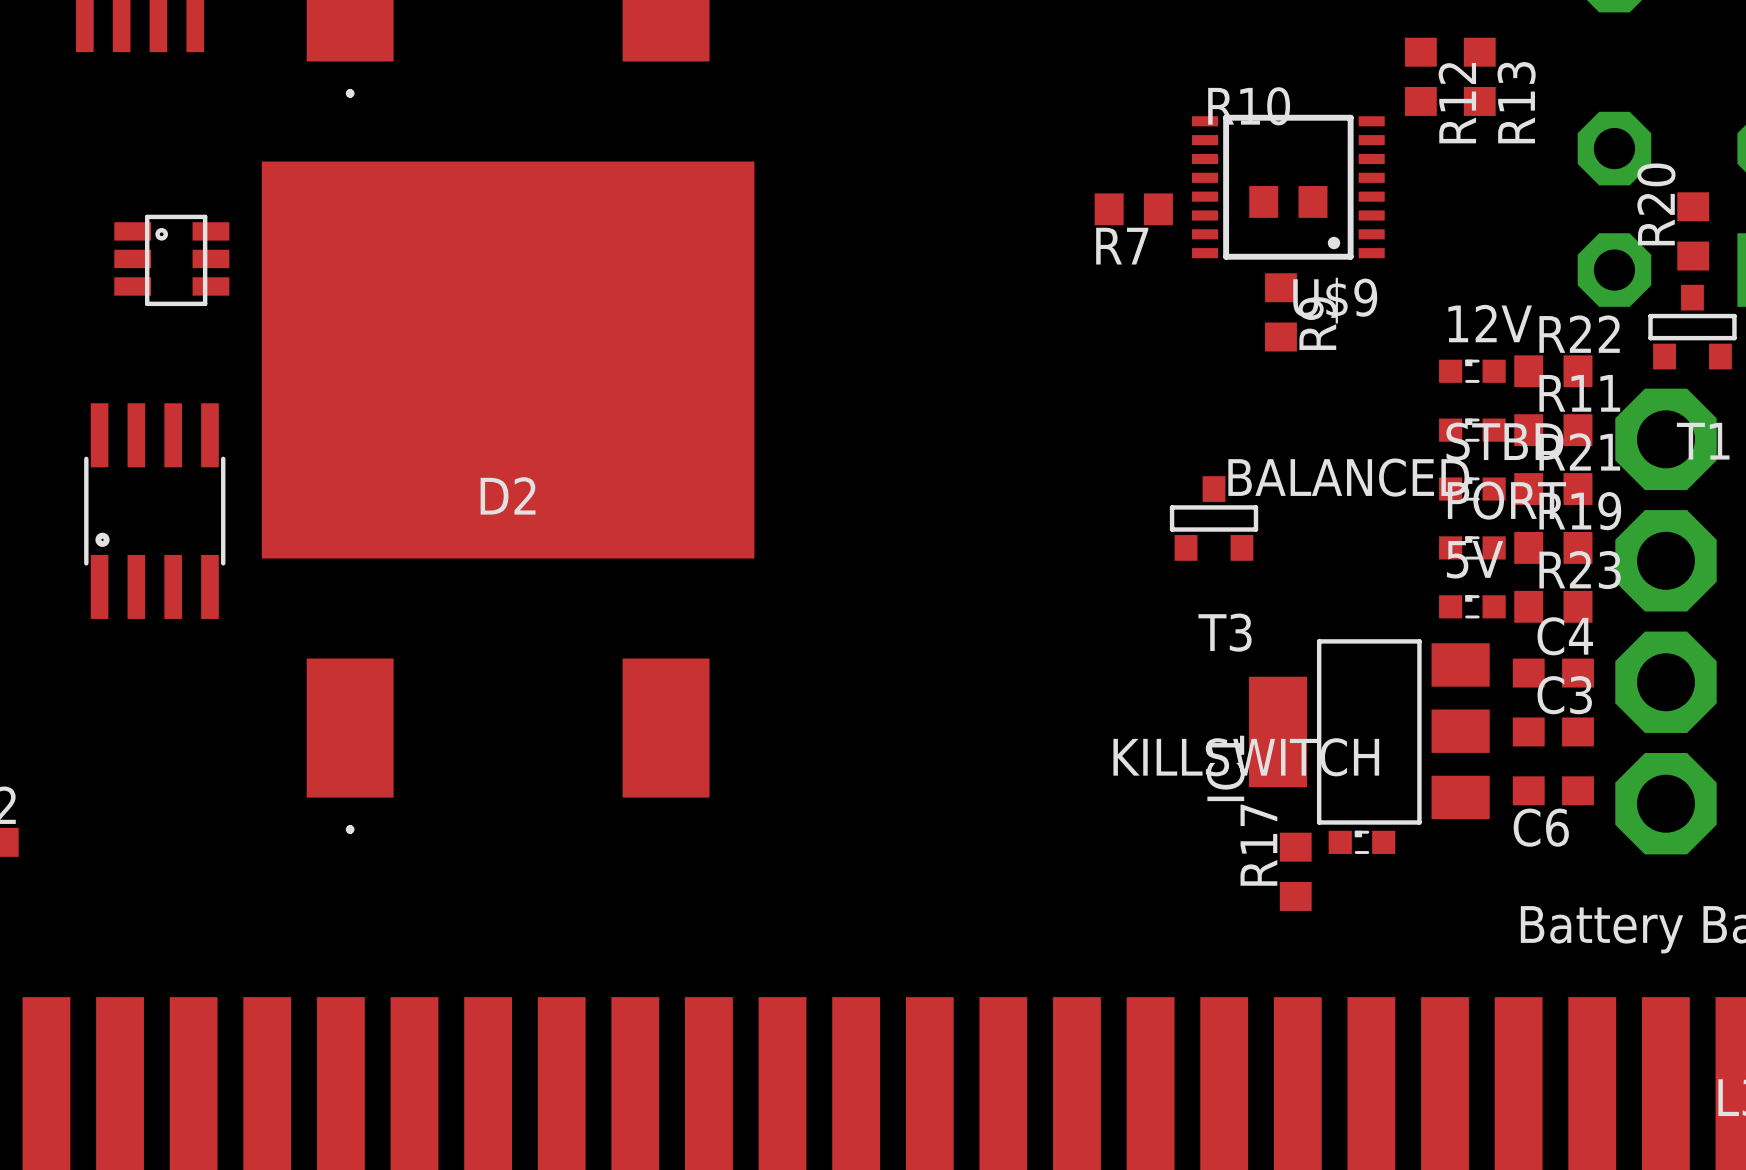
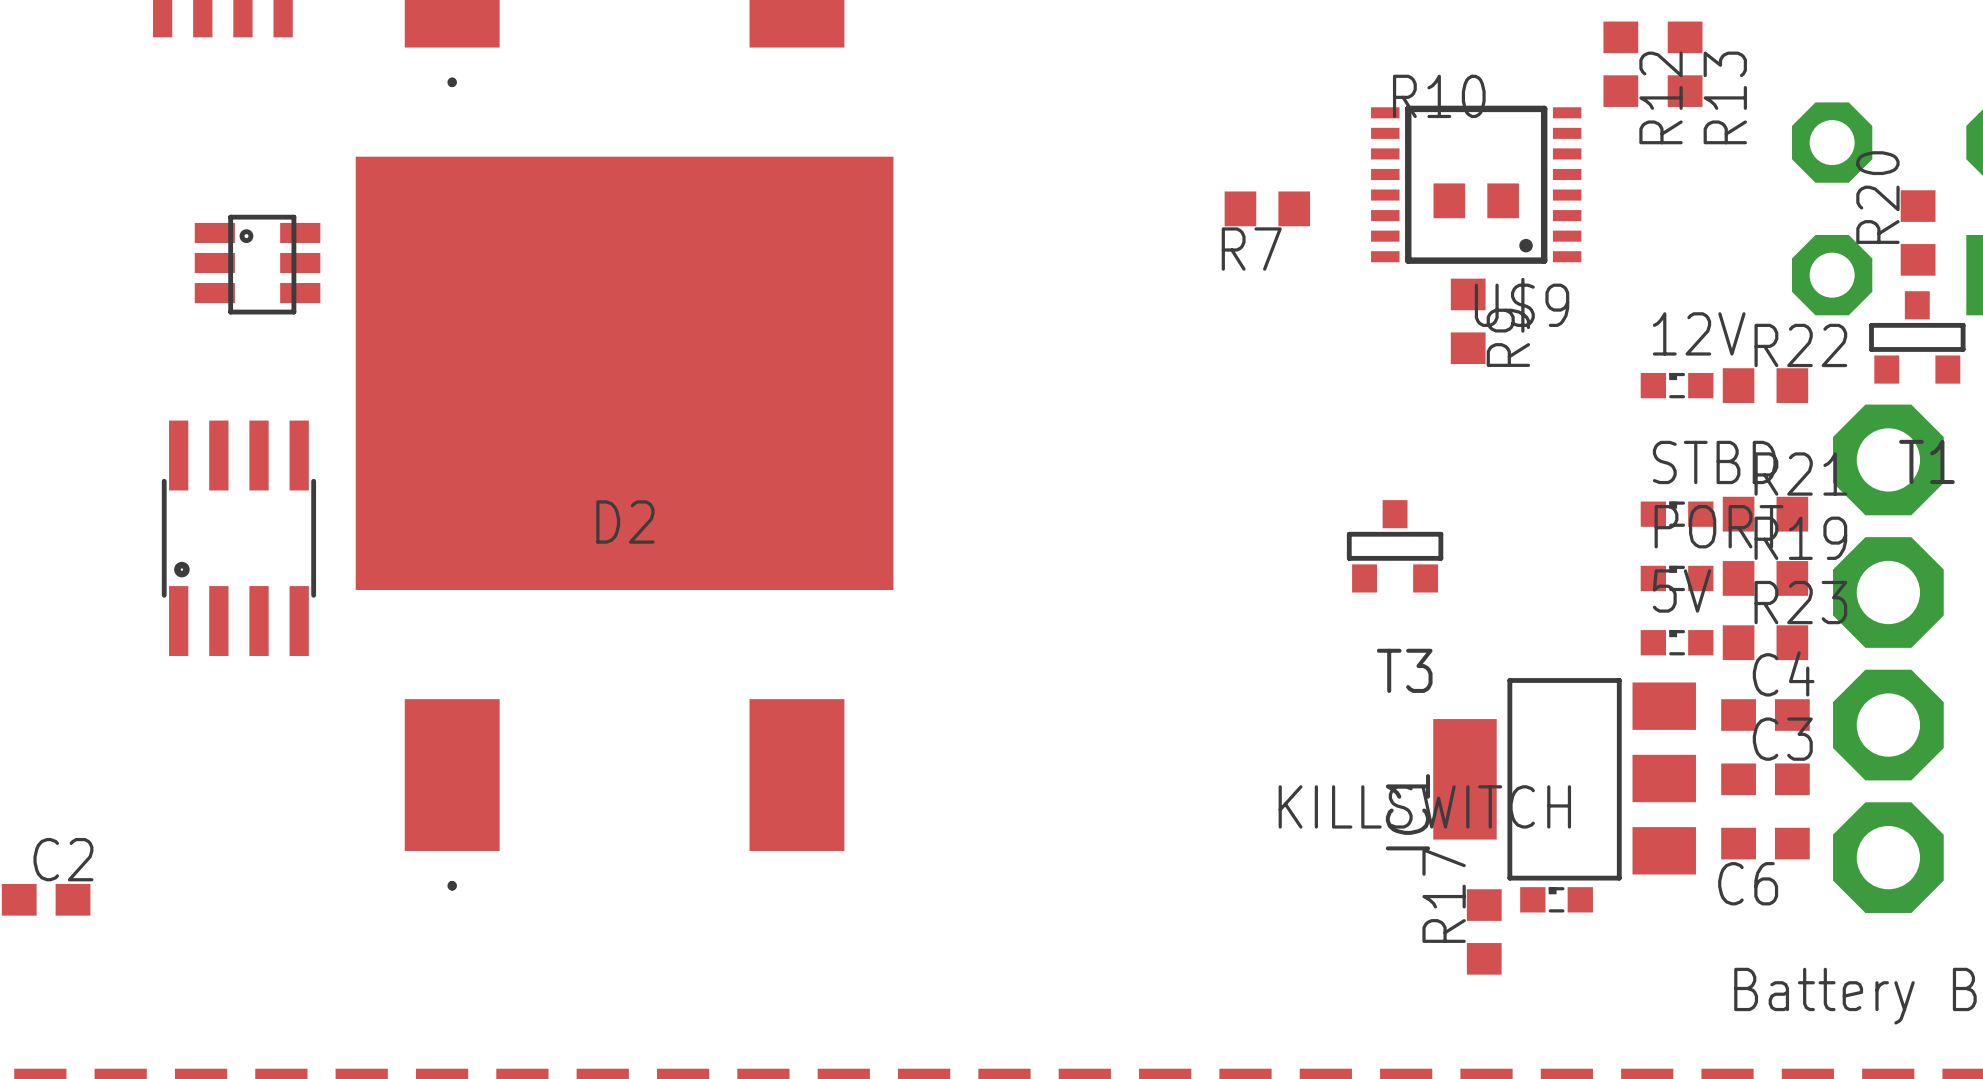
R7 position: (1133, 209) -> (1267, 208)
BALANCED: (1472, 430) -> none
R11: (1553, 430) -> none

